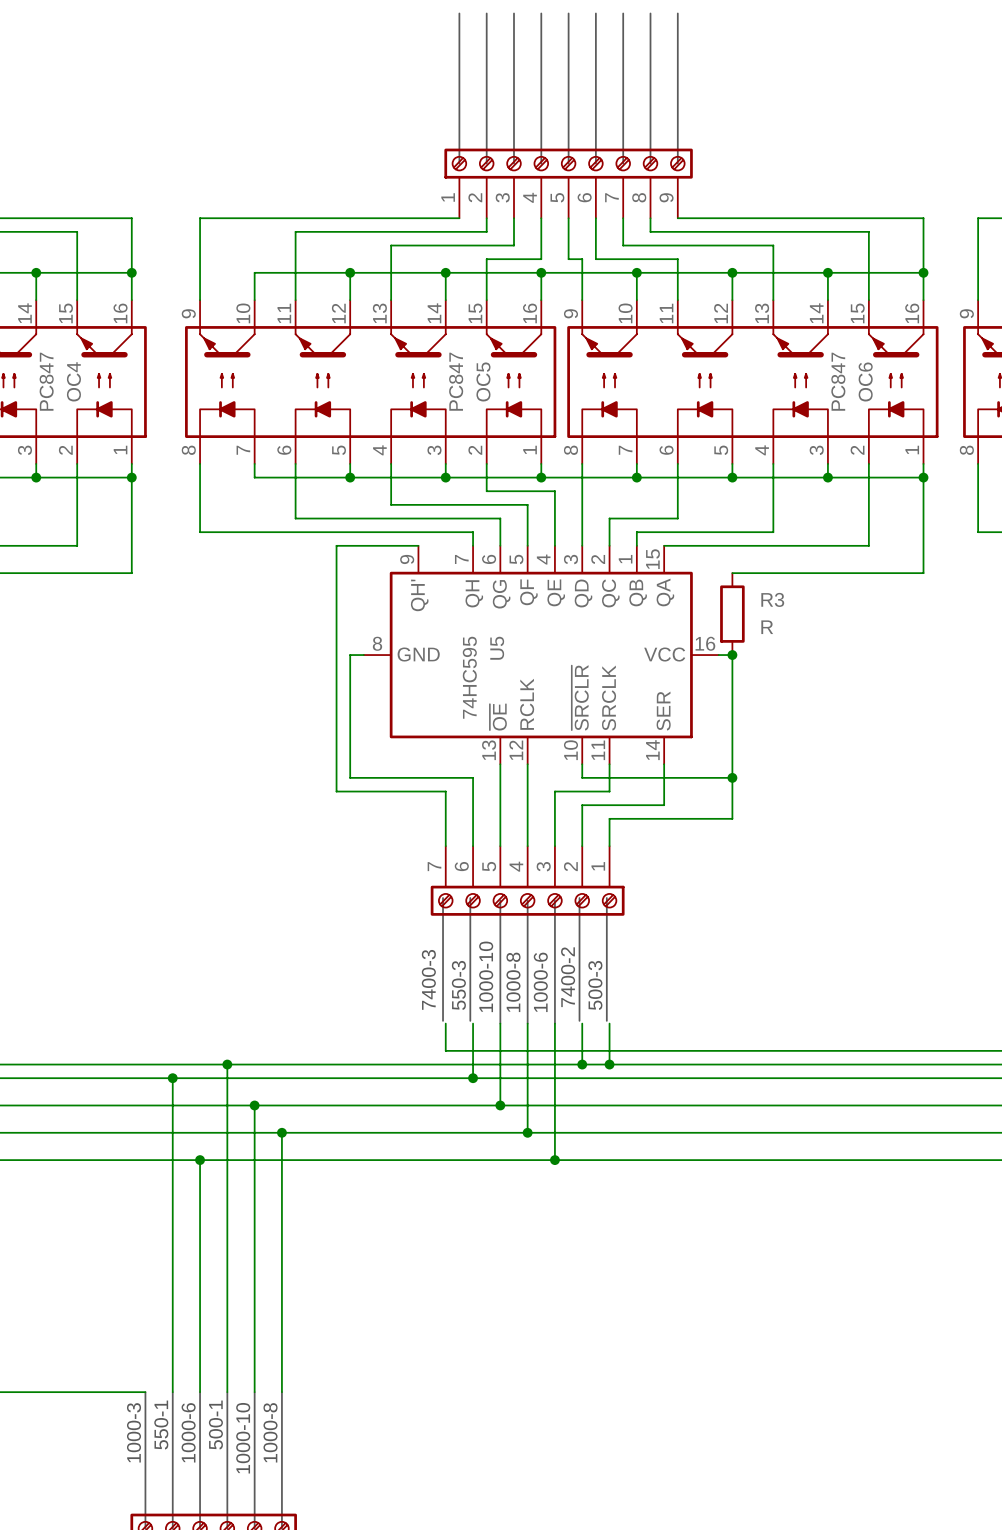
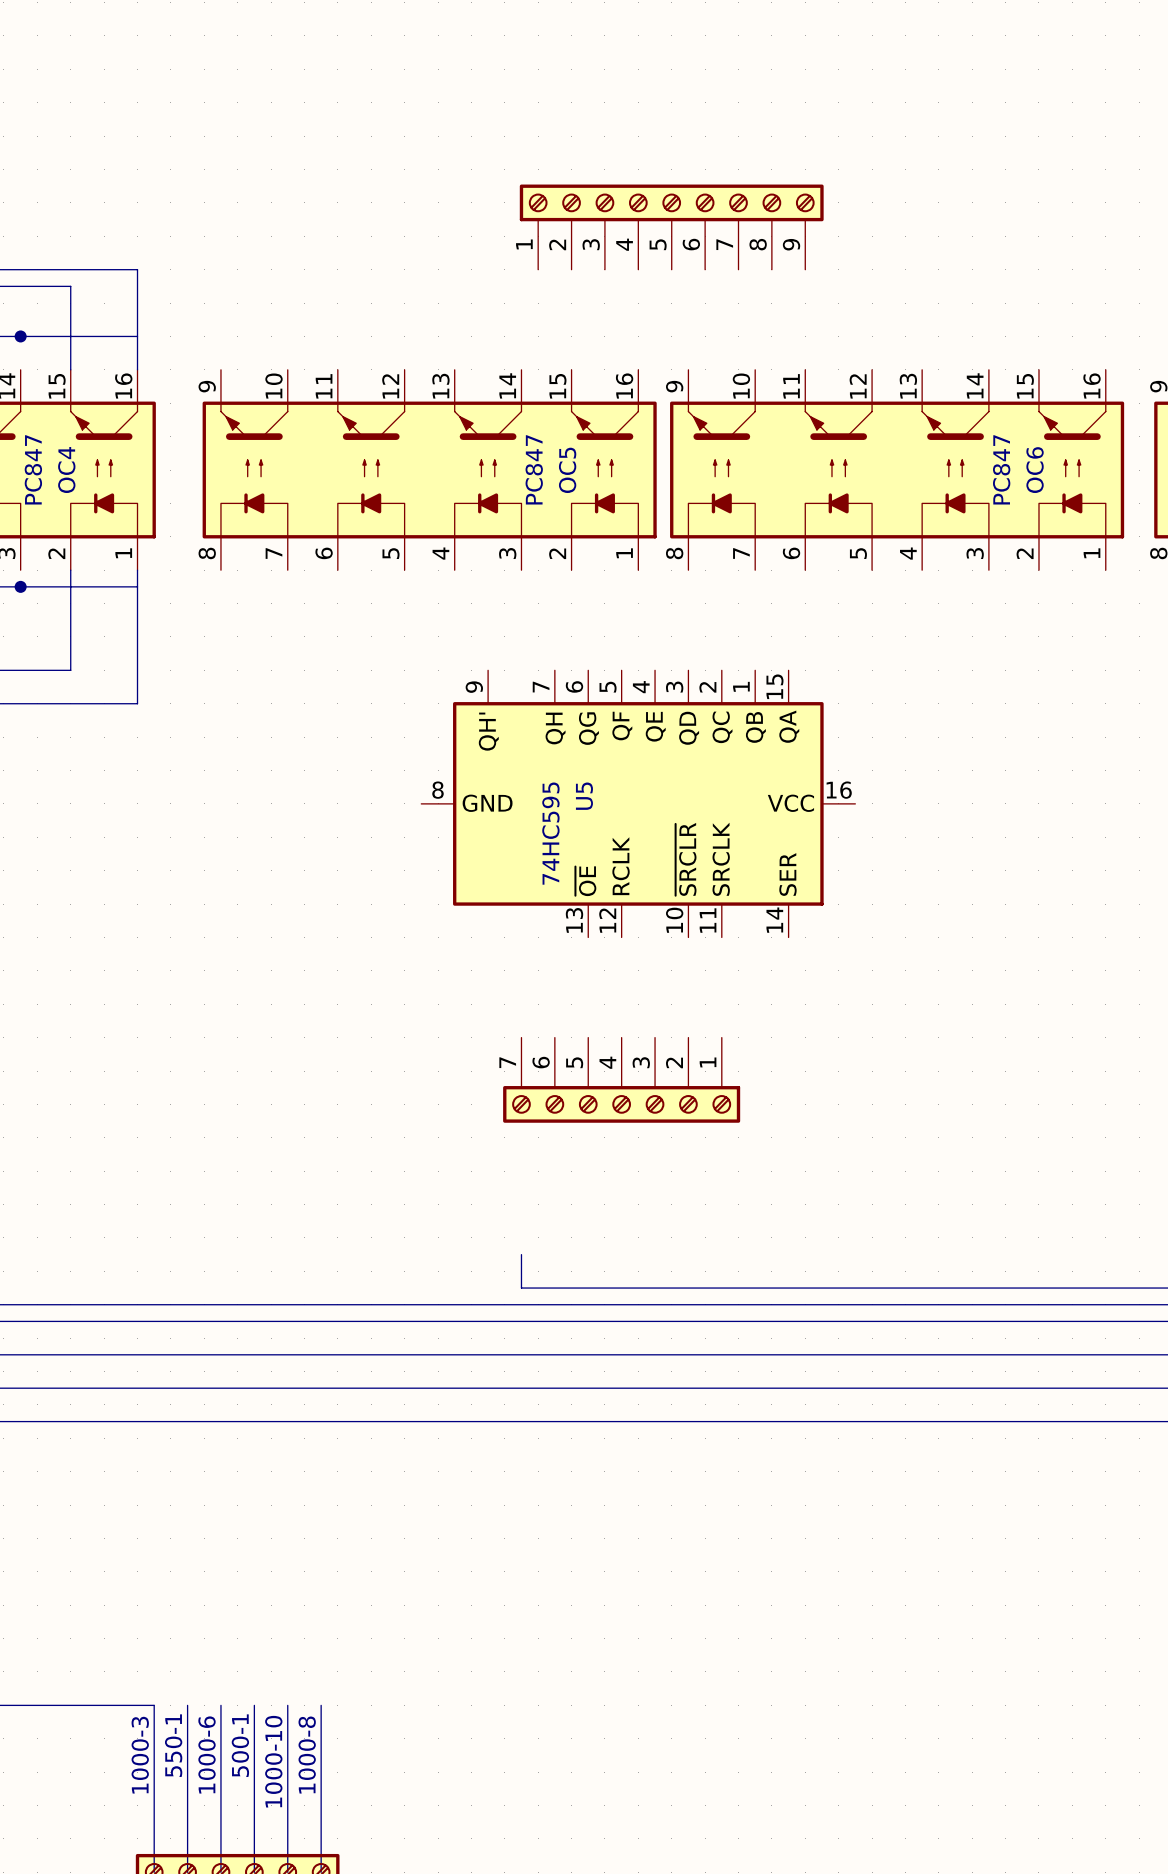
line: (459, 13) (459, 163) -> none
line: (486, 13) (486, 163) -> none
line: (514, 13) (514, 163) -> none
line: (541, 13) (541, 163) -> none
line: (568, 13) (568, 163) -> none
line: (595, 13) (595, 163) -> none
line: (623, 13) (623, 163) -> none
line: (650, 13) (650, 163) -> none
line: (677, 13) (677, 163) -> none
wire: (459, 218) (200, 218) (200, 300) -> none
wire: (486, 218) (486, 231) (295, 231) (295, 300) -> none
wire: (514, 218) (514, 245) (391, 245) (391, 300) -> none
wire: (541, 218) (541, 259) (486, 259) (486, 300) -> none
wire: (568, 218) (568, 259) (582, 259) (582, 300) -> none
wire: (595, 218) (595, 259) (677, 259) (677, 300) -> none
wire: (623, 218) (623, 245) (773, 245) (773, 300) -> none
wire: (650, 218) (650, 231) (868, 231) (868, 300) -> none
wire: (677, 218) (923, 218) (923, 300) -> none
wire: (36, 272) (36, 300) -> none
junction: (131, 272) -> none
wire: (350, 272) (350, 300) -> none
junction: (350, 272) -> none
wire: (445, 272) (445, 300) -> none
junction: (445, 272) -> none
wire: (541, 272) (541, 300) -> none
junction: (541, 272) -> none
wire: (636, 272) (636, 300) -> none
junction: (636, 272) -> none
wire: (732, 272) (732, 300) -> none
junction: (732, 272) -> none
wire: (827, 272) (827, 300) -> none
junction: (827, 272) -> none
wire: (923, 272) (254, 272) (254, 300) -> none
junction: (923, 272) -> none
wire: (36, 463) (36, 477) -> none
wire: (200, 463) (200, 532) (473, 532) (473, 545) -> none
wire: (254, 463) (254, 477) (923, 477) -> none
wire: (295, 463) (295, 518) (500, 518) (500, 545) -> none
wire: (350, 463) (350, 477) -> none
wire: (391, 463) (391, 504) (527, 504) (527, 545) -> none
wire: (445, 463) (445, 477) -> none
wire: (486, 463) (486, 491) (554, 491) (554, 545) -> none
wire: (541, 463) (541, 477) -> none
wire: (582, 463) (582, 545) -> none
wire: (636, 463) (636, 477) -> none
wire: (677, 463) (677, 518) (609, 518) (609, 545) -> none
wire: (732, 463) (732, 477) -> none
wire: (773, 463) (773, 532) (636, 532) (636, 545) -> none
wire: (827, 463) (827, 477) -> none
wire: (868, 463) (868, 545) (664, 545) -> none
wire: (923, 463) (923, 573) (732, 573) -> none
junction: (131, 477) -> none
junction: (350, 477) -> none
junction: (445, 477) -> none
junction: (541, 477) -> none
junction: (636, 477) -> none
junction: (732, 477) -> none
junction: (827, 477) -> none
junction: (923, 477) -> none
wire: (418, 545) (336, 545) (336, 791) (445, 791) (445, 846) -> none
R3: R (732, 614) -> none
wire: (363, 655) (350, 655) (350, 777) (473, 777) (473, 846) -> none
wire: (718, 655) (732, 655) (732, 818) (609, 818) (609, 846) -> none
junction: (732, 655) -> none
wire: (500, 764) (500, 846) -> none
wire: (527, 764) (527, 846) -> none
wire: (582, 764) (582, 777) (732, 777) -> none
wire: (609, 764) (609, 791) (554, 791) (554, 846) -> none
wire: (664, 764) (664, 805) (582, 805) (582, 846) -> none
junction: (732, 777) -> none
line: (443, 898) (443, 1020) -> none
line: (470, 898) (470, 1020) -> none
line: (579, 898) (579, 1020) -> none
line: (606, 898) (606, 1020) -> none
line: (500, 900) (500, 1023) -> none
line: (527, 900) (527, 1023) -> none
line: (554, 900) (554, 1023) -> none
text: 1000-10 (486, 976) -> none
text: 7400-2 (568, 977) -> none
text: 7400-3 (428, 979) -> none
text: 1000-8 (513, 982) -> none
text: 1000-6 (540, 982) -> none
text: 550-3 (458, 985) -> none
text: 500-3 (595, 985) -> none
wire: (473, 1023) (473, 1078) -> none
wire: (500, 1023) (500, 1105) -> none
wire: (527, 1023) (527, 1132) -> none
wire: (554, 1023) (554, 1160) -> none
wire: (582, 1023) (582, 1064) -> none
wire: (609, 1023) (609, 1064) -> none
wire: (227, 1064) (227, 1392) -> none
junction: (227, 1064) -> none
junction: (582, 1064) -> none
junction: (609, 1064) -> none
wire: (172, 1078) (172, 1392) -> none
junction: (172, 1078) -> none
junction: (473, 1078) -> none
wire: (254, 1105) (254, 1392) -> none
junction: (254, 1105) -> none
junction: (500, 1105) -> none
wire: (281, 1132) (281, 1392) -> none
junction: (281, 1132) -> none
junction: (527, 1132) -> none
wire: (200, 1160) (200, 1392) -> none
junction: (200, 1160) -> none
junction: (554, 1160) -> none

